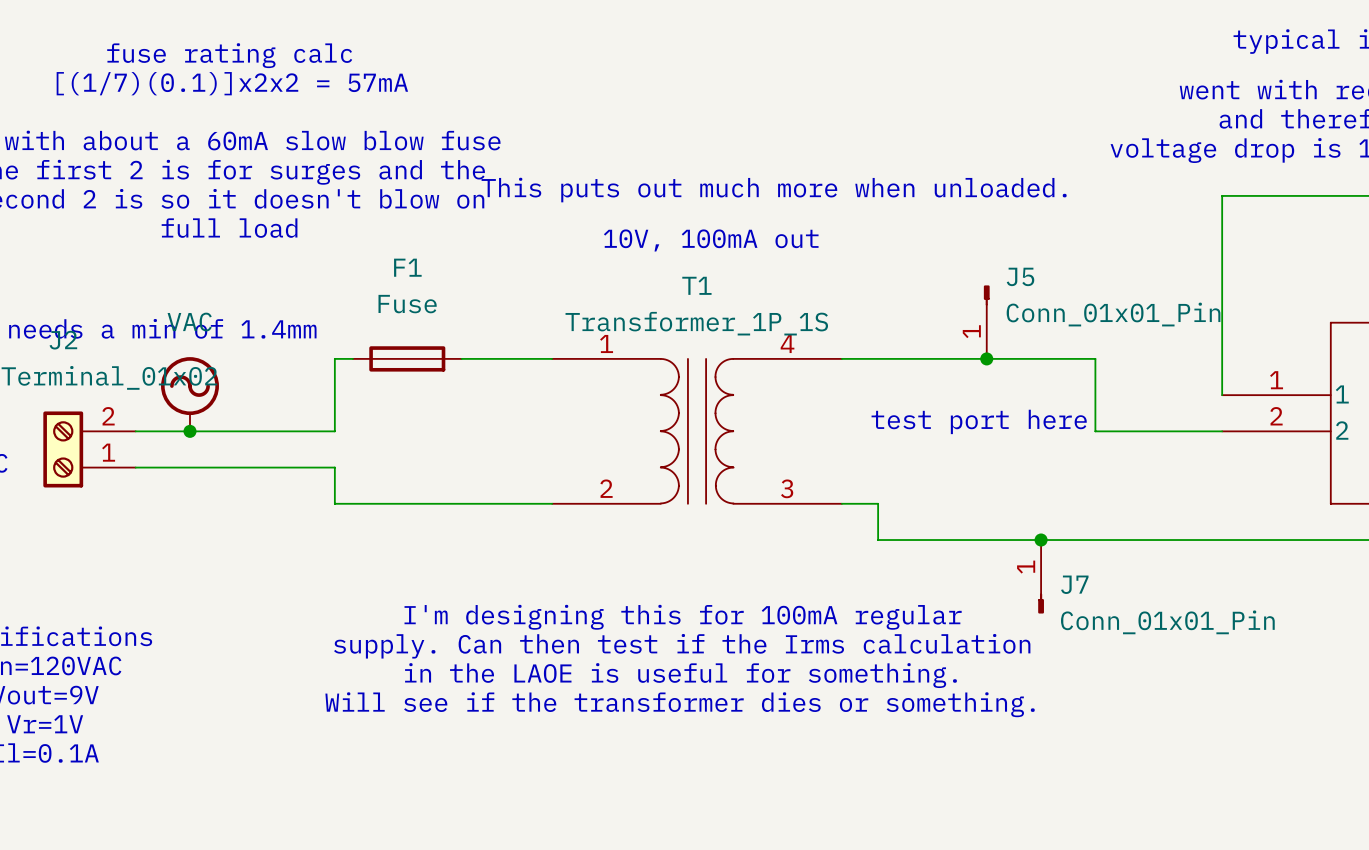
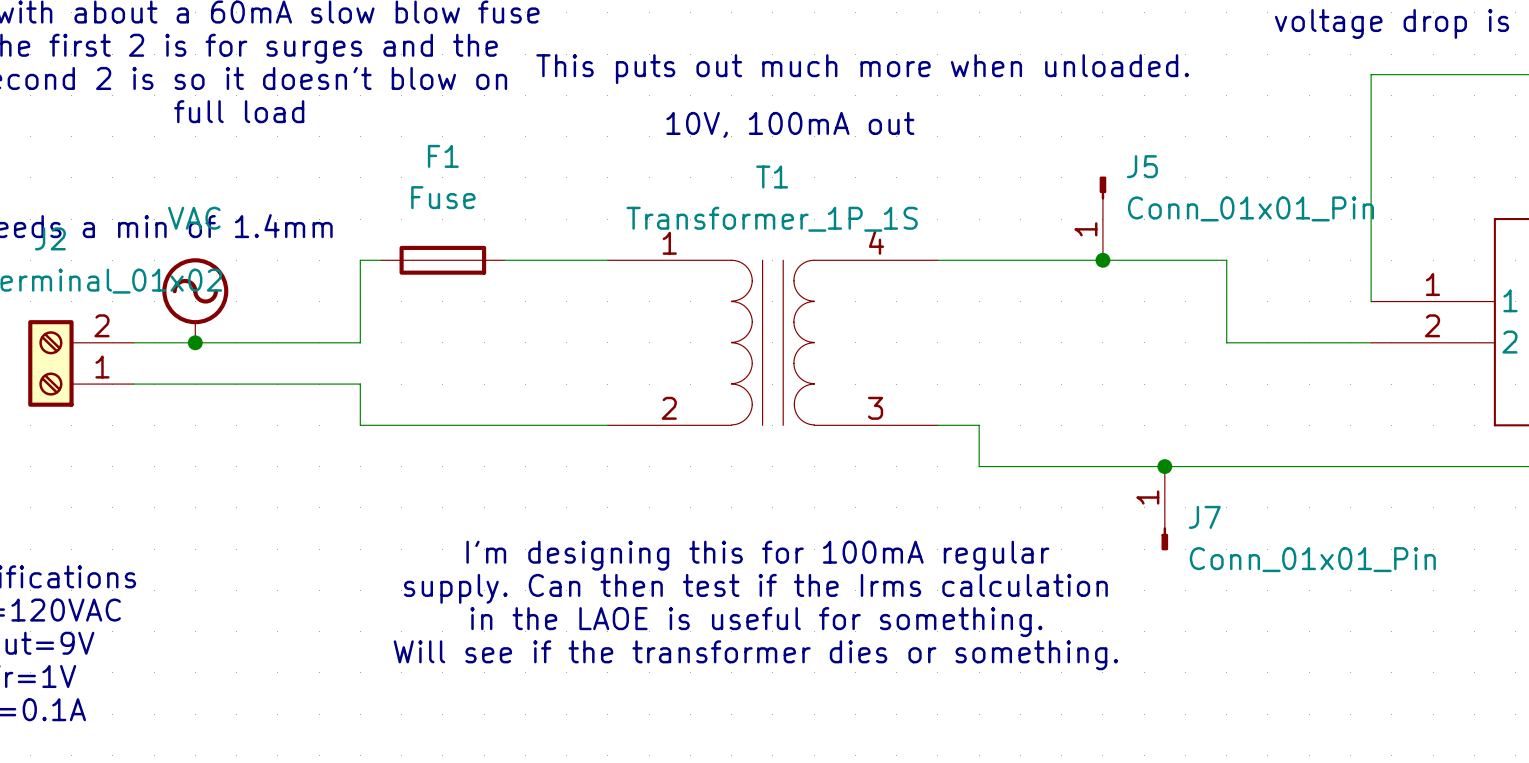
text: test port here (979, 421) -> none

